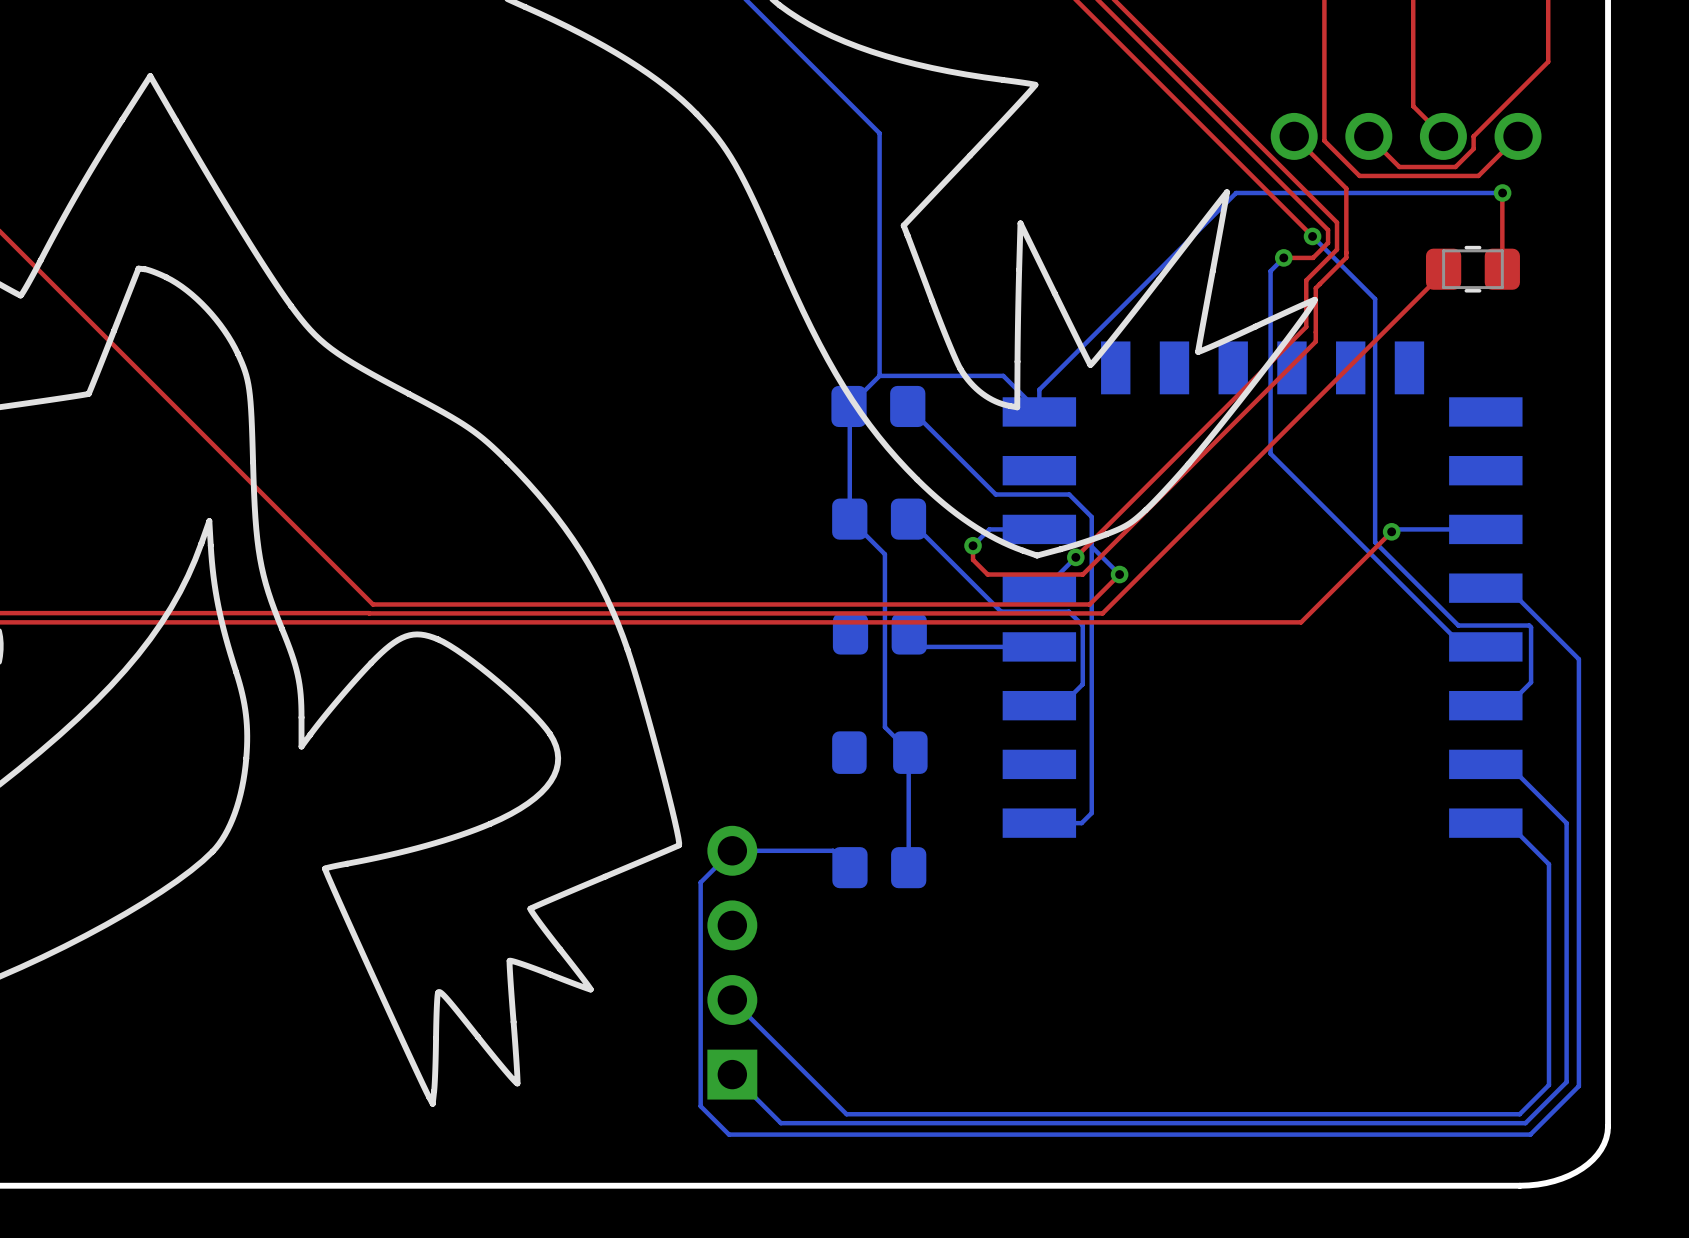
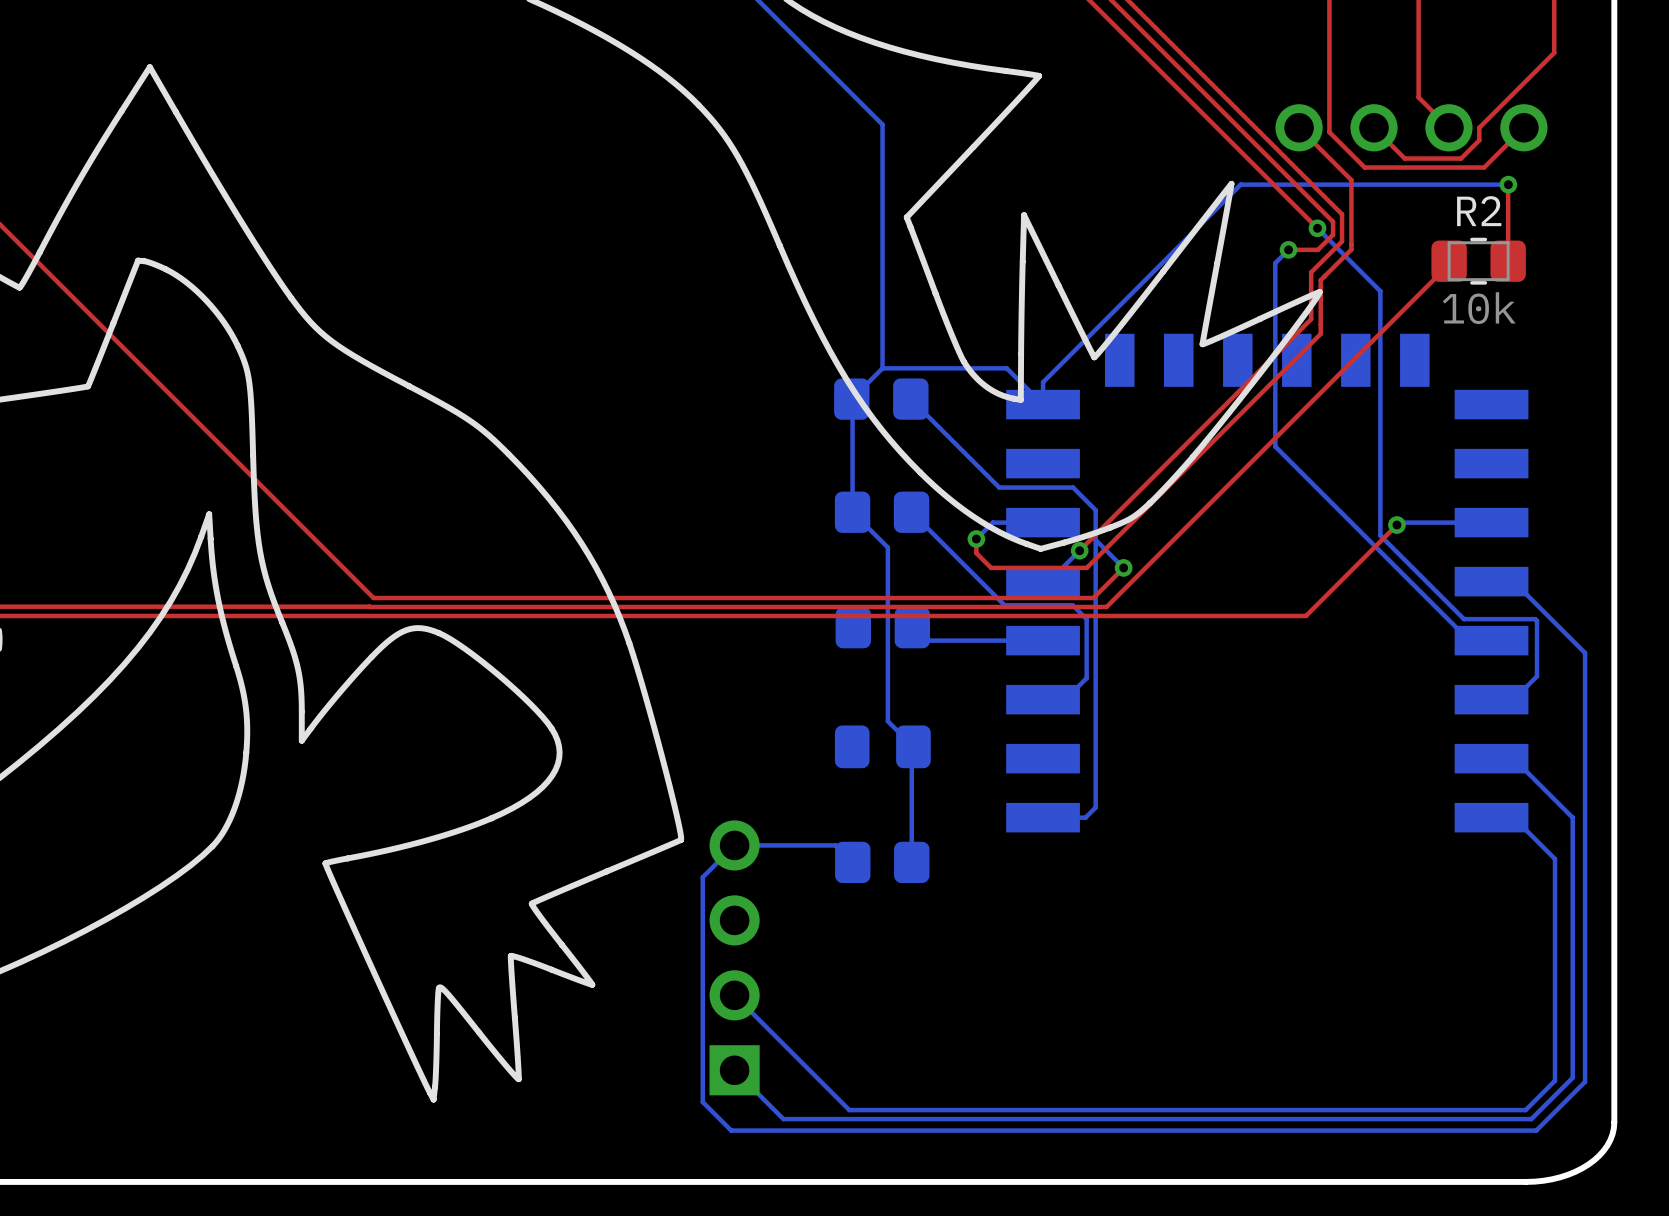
R2 name: none -> R2 (1479, 211)
R2 value: none -> 10k (1479, 308)

